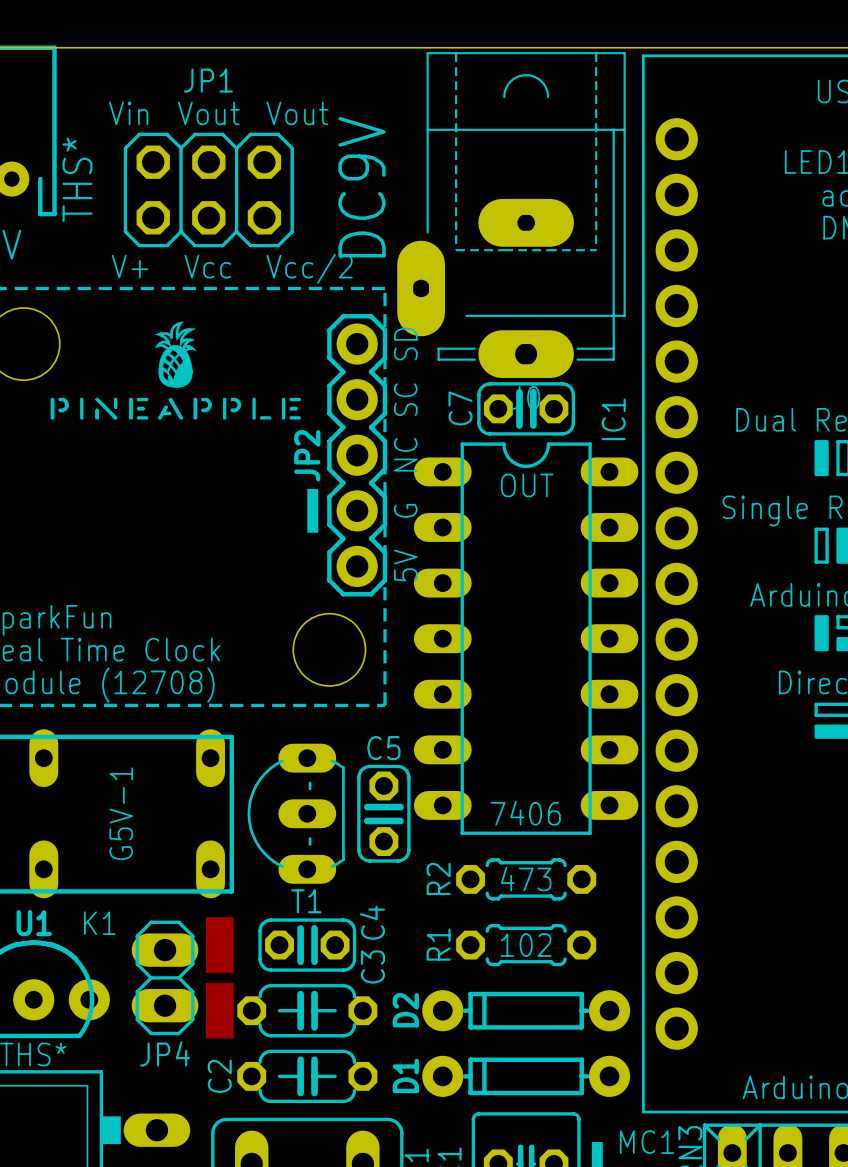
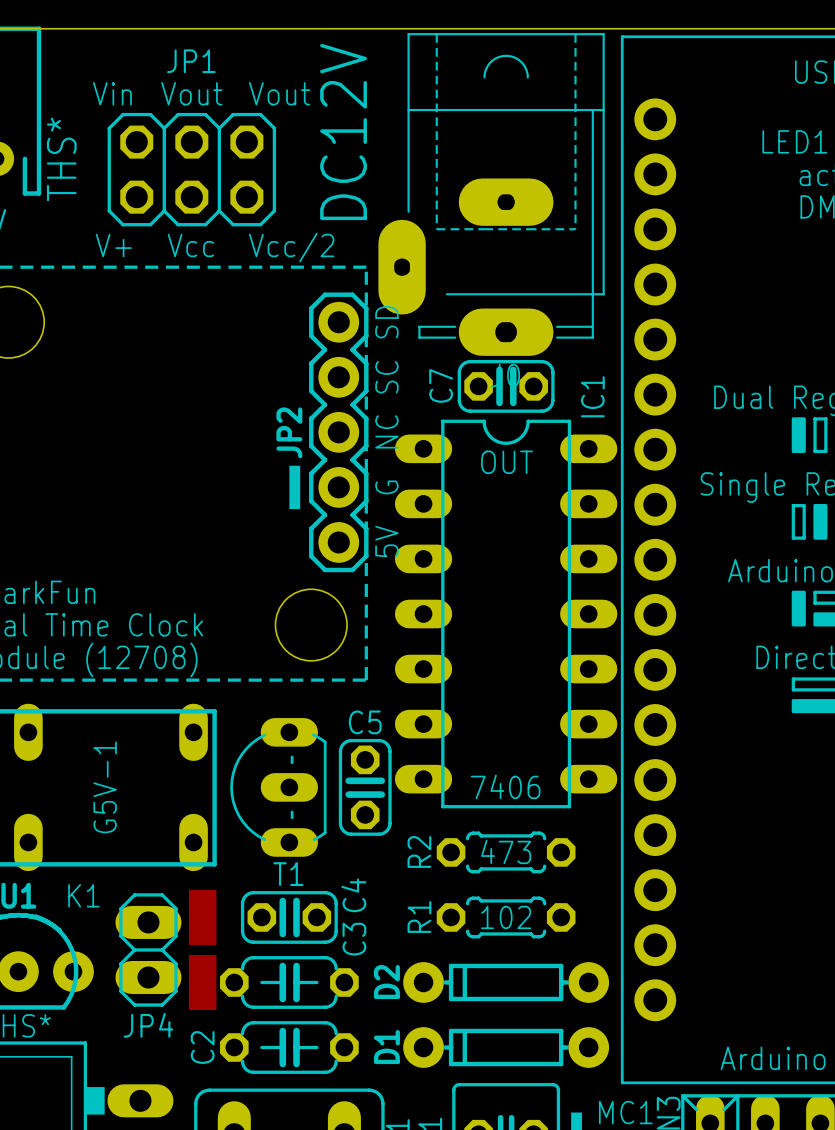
text: DC9V (362, 187) -> DC12V (343, 131)
drawing: [50, 321, 301, 420] -> none

